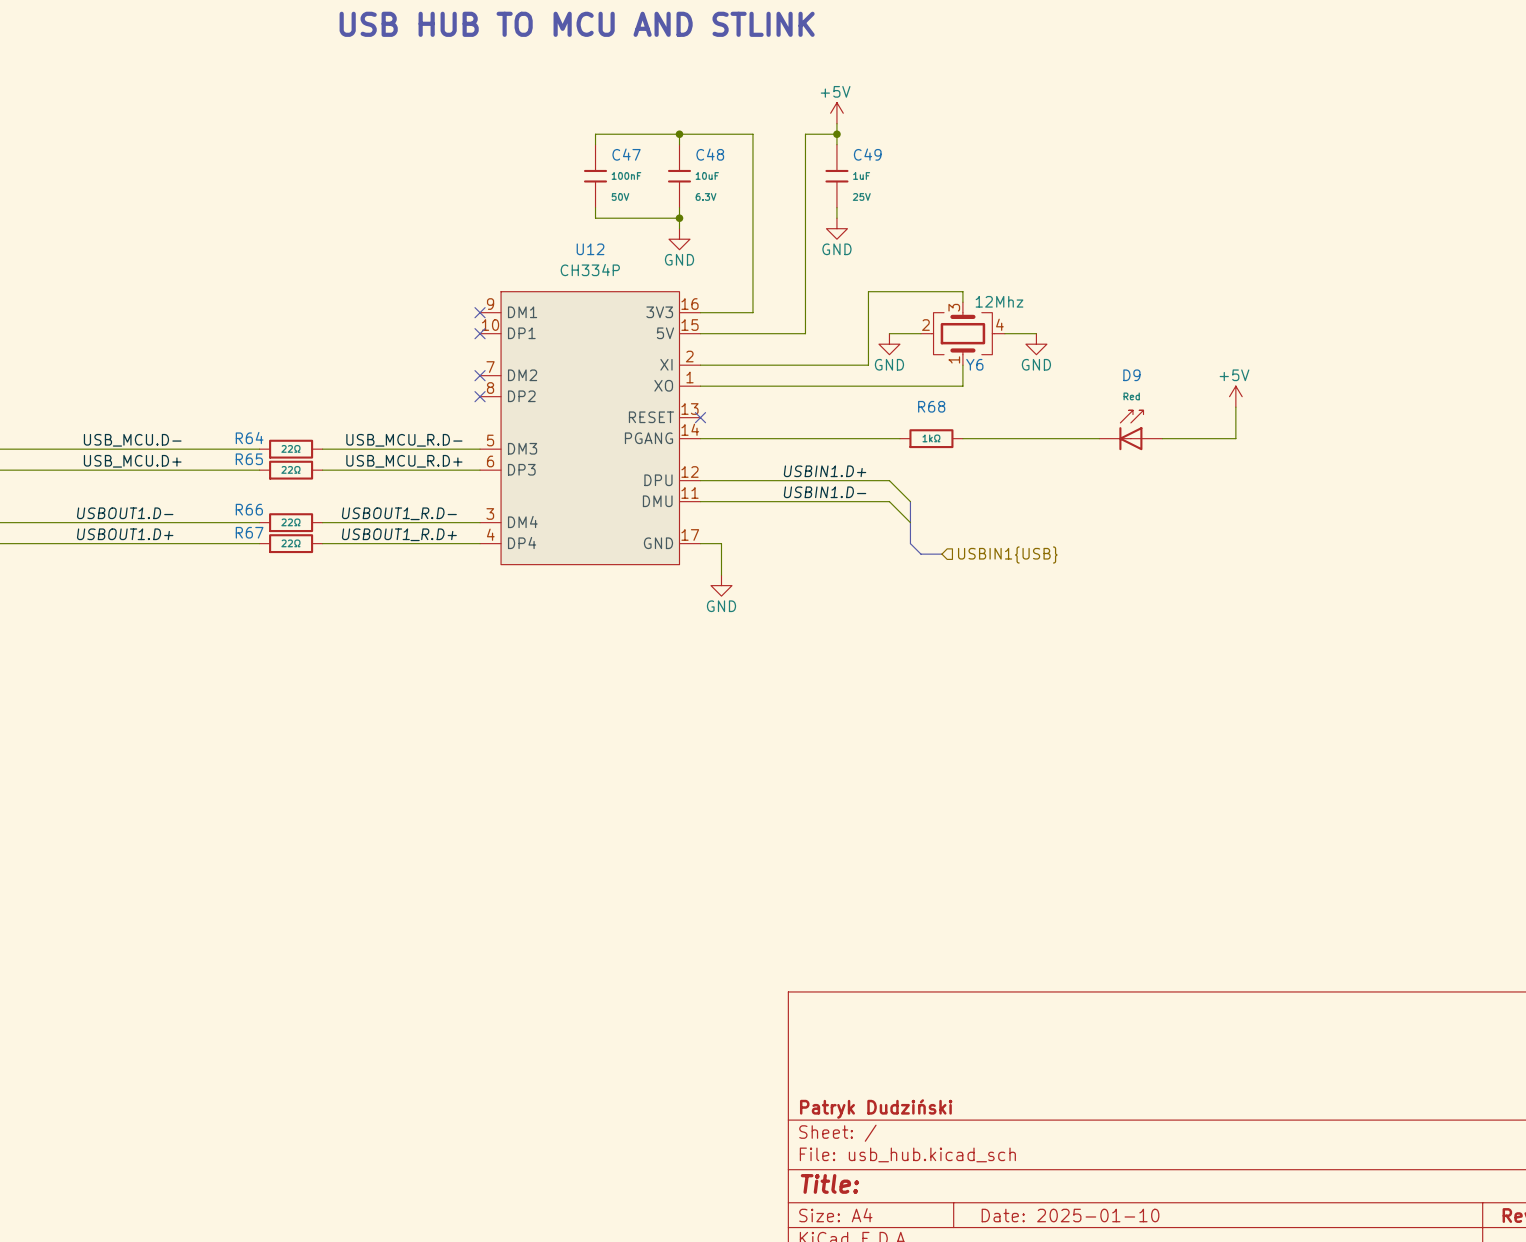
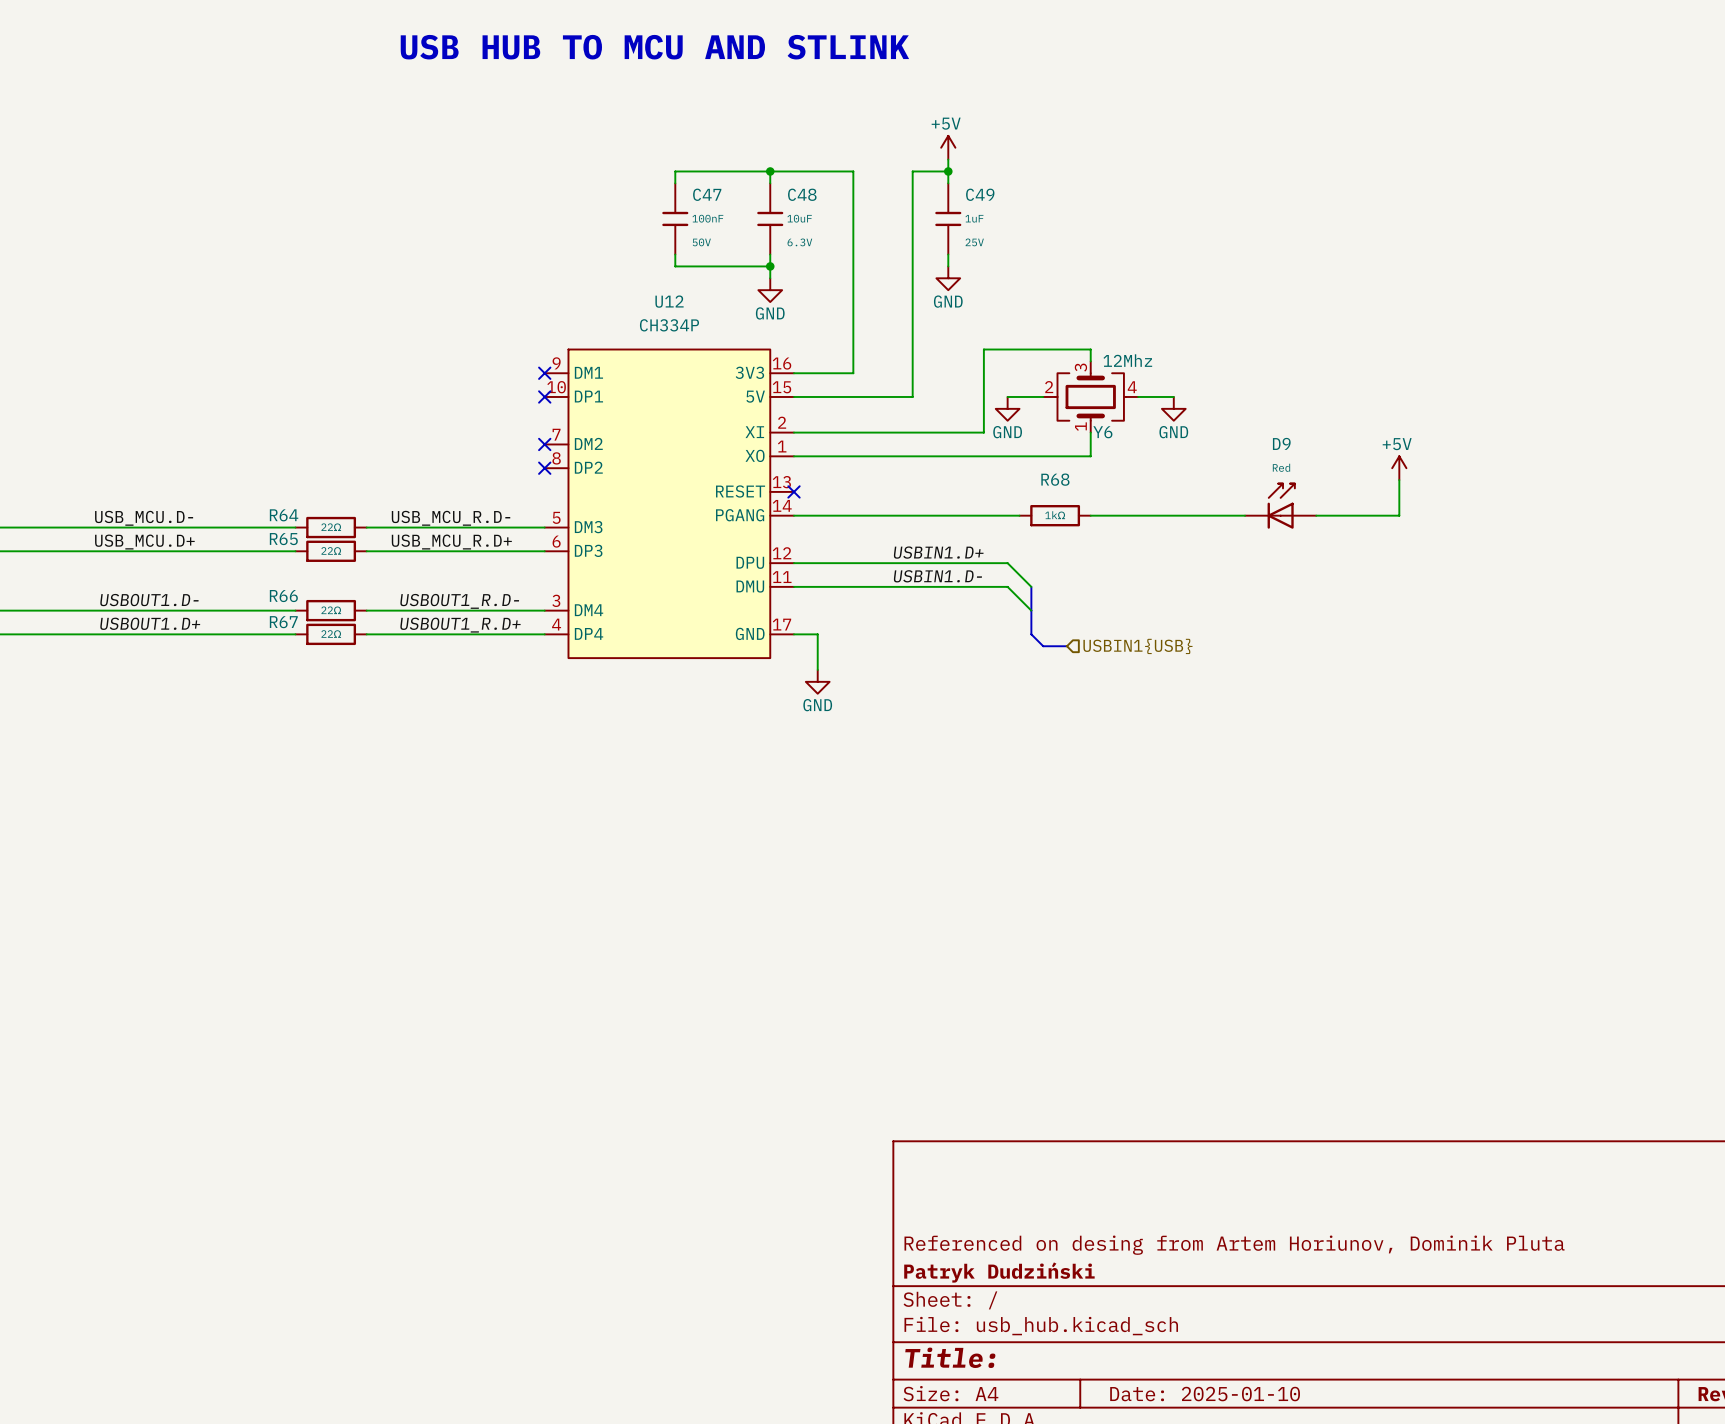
title block: none -> Referenced on desing from Artem Horiunov, Dominik Pluta (1234, 1245)

